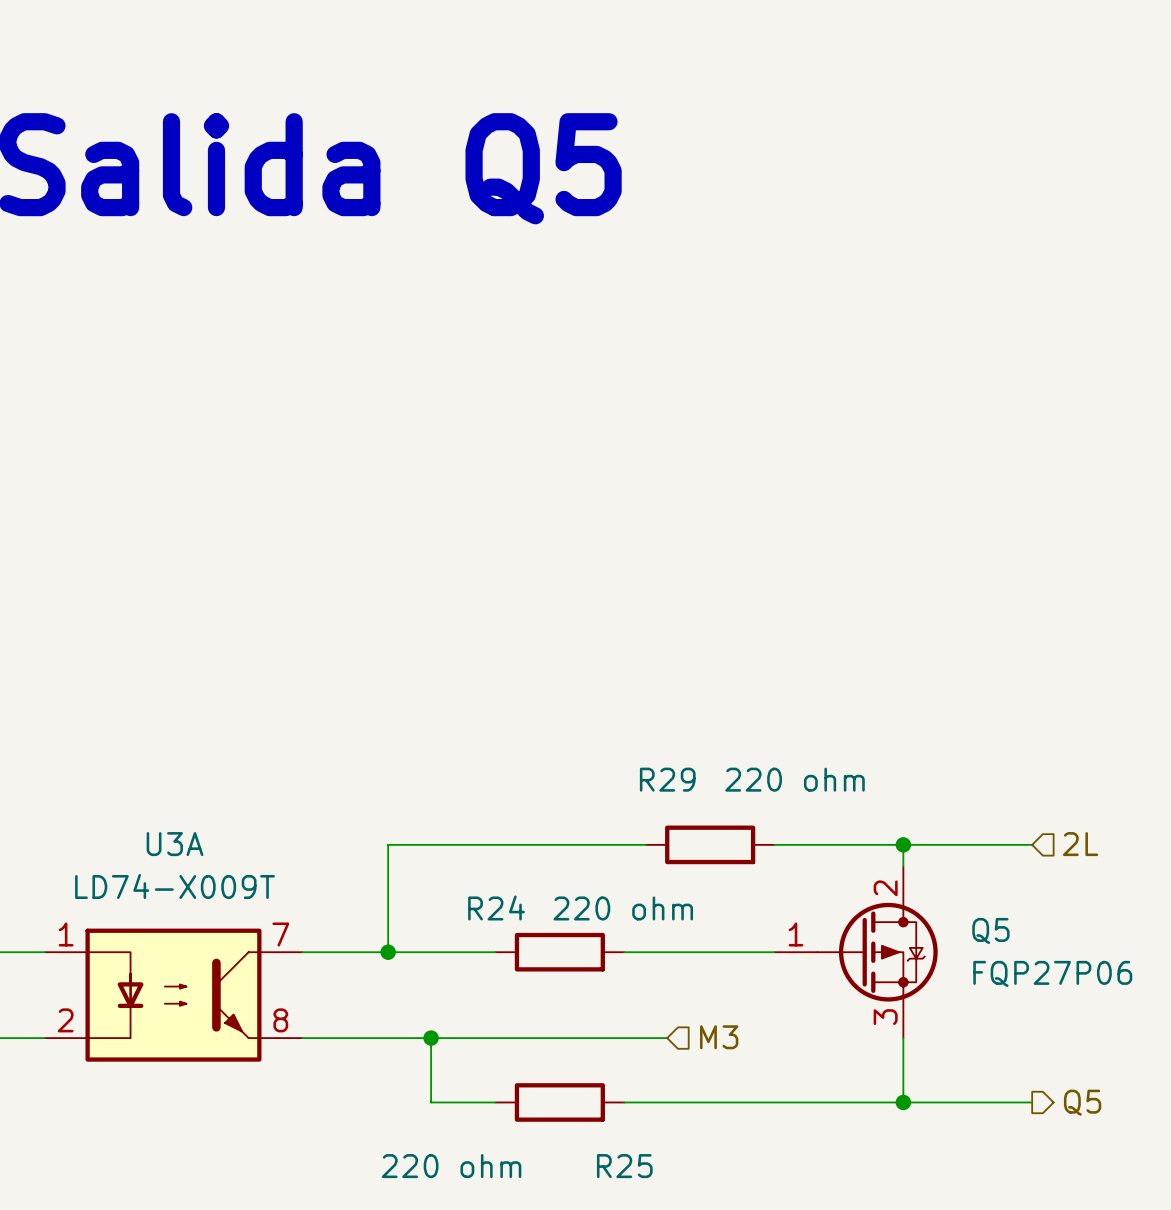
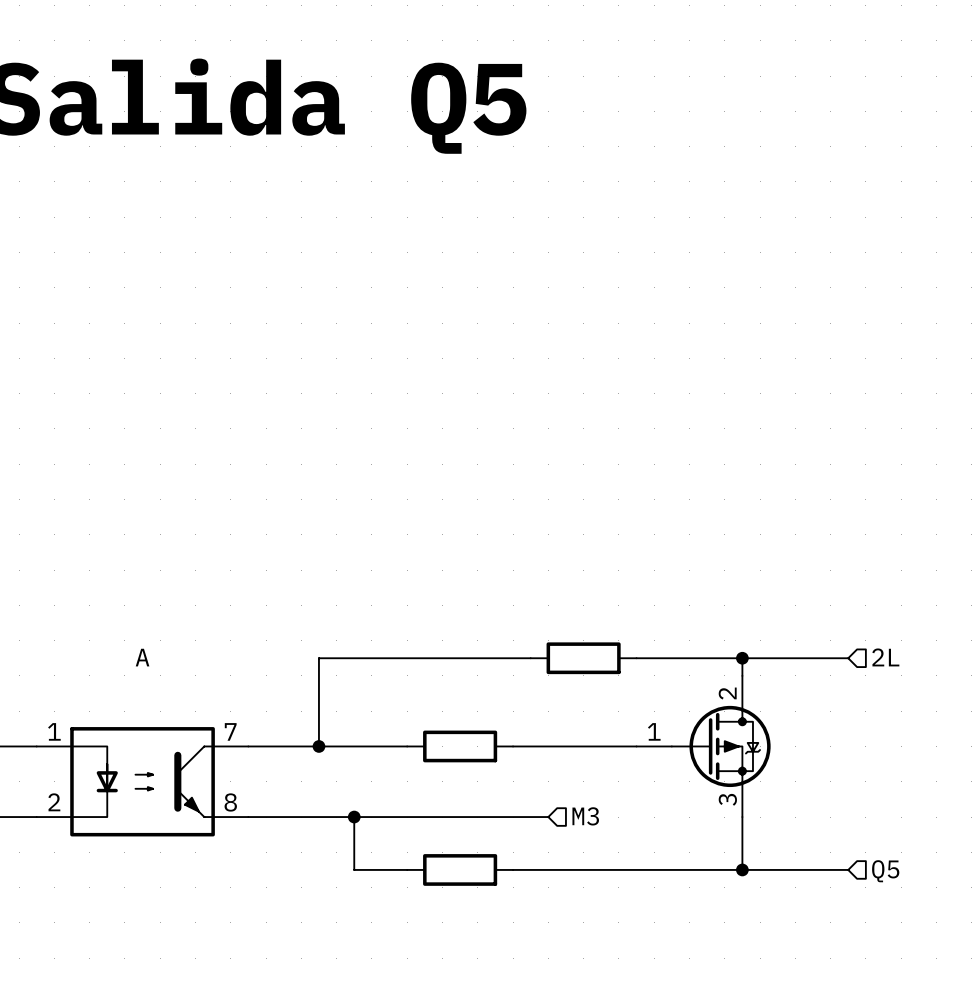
R29 name: R29 (667, 779) -> none
R29 value: 220 ohm (795, 779) -> none
U3A name: U3A (175, 844) -> A (142, 657)
U3A value: LD74-X009T (175, 886) -> none
R24 name: R24 (496, 907) -> none
R24 value: 220 ohm (623, 908) -> none
Q5 name: Q5 (990, 930) -> none
Q5 value: FQP27P06 (1052, 973) -> none
hierarchical label shape: output (1082, 1102) -> input (885, 871)
R25 value: 220 ohm (451, 1166) -> none
R25 name: R25 (624, 1166) -> none

